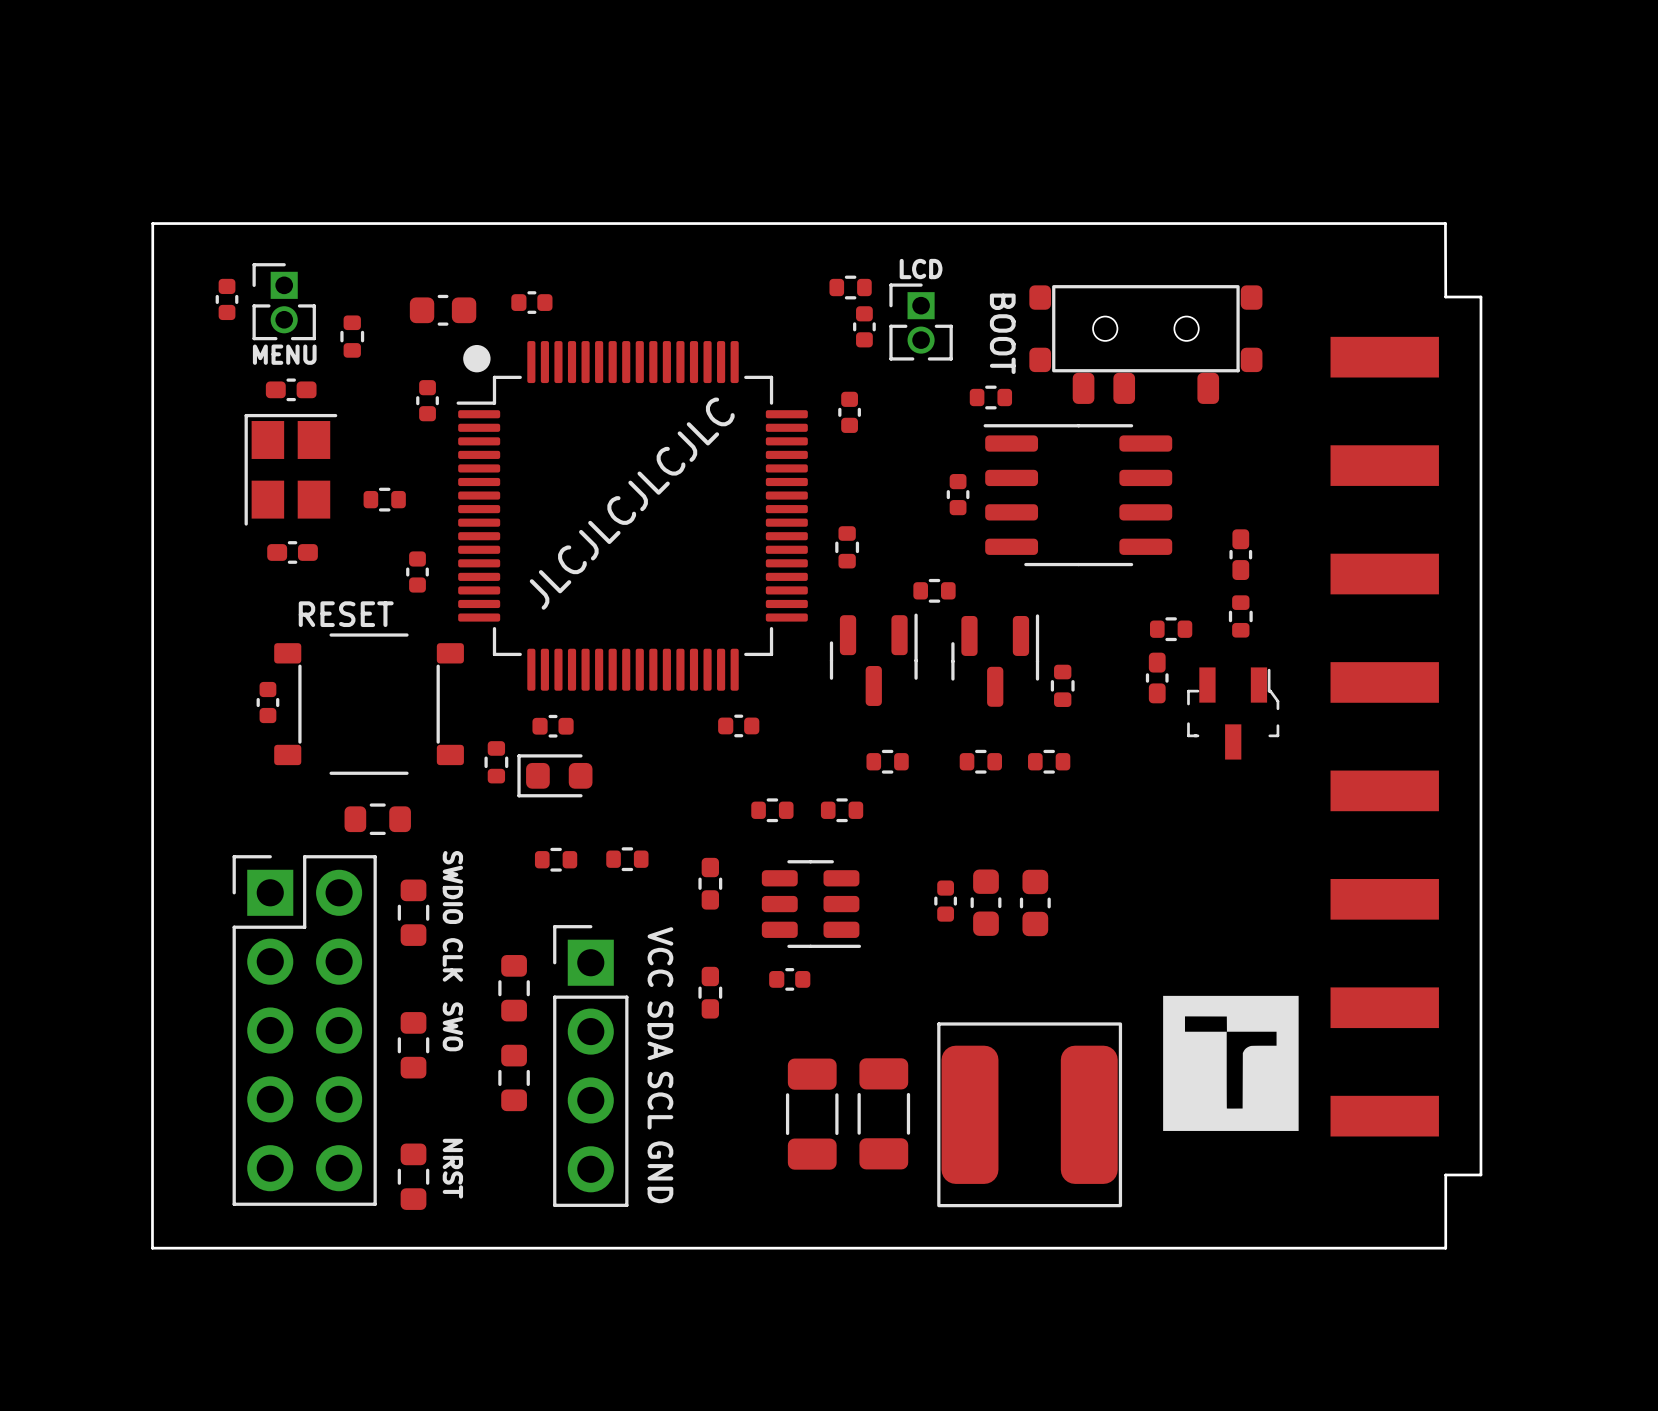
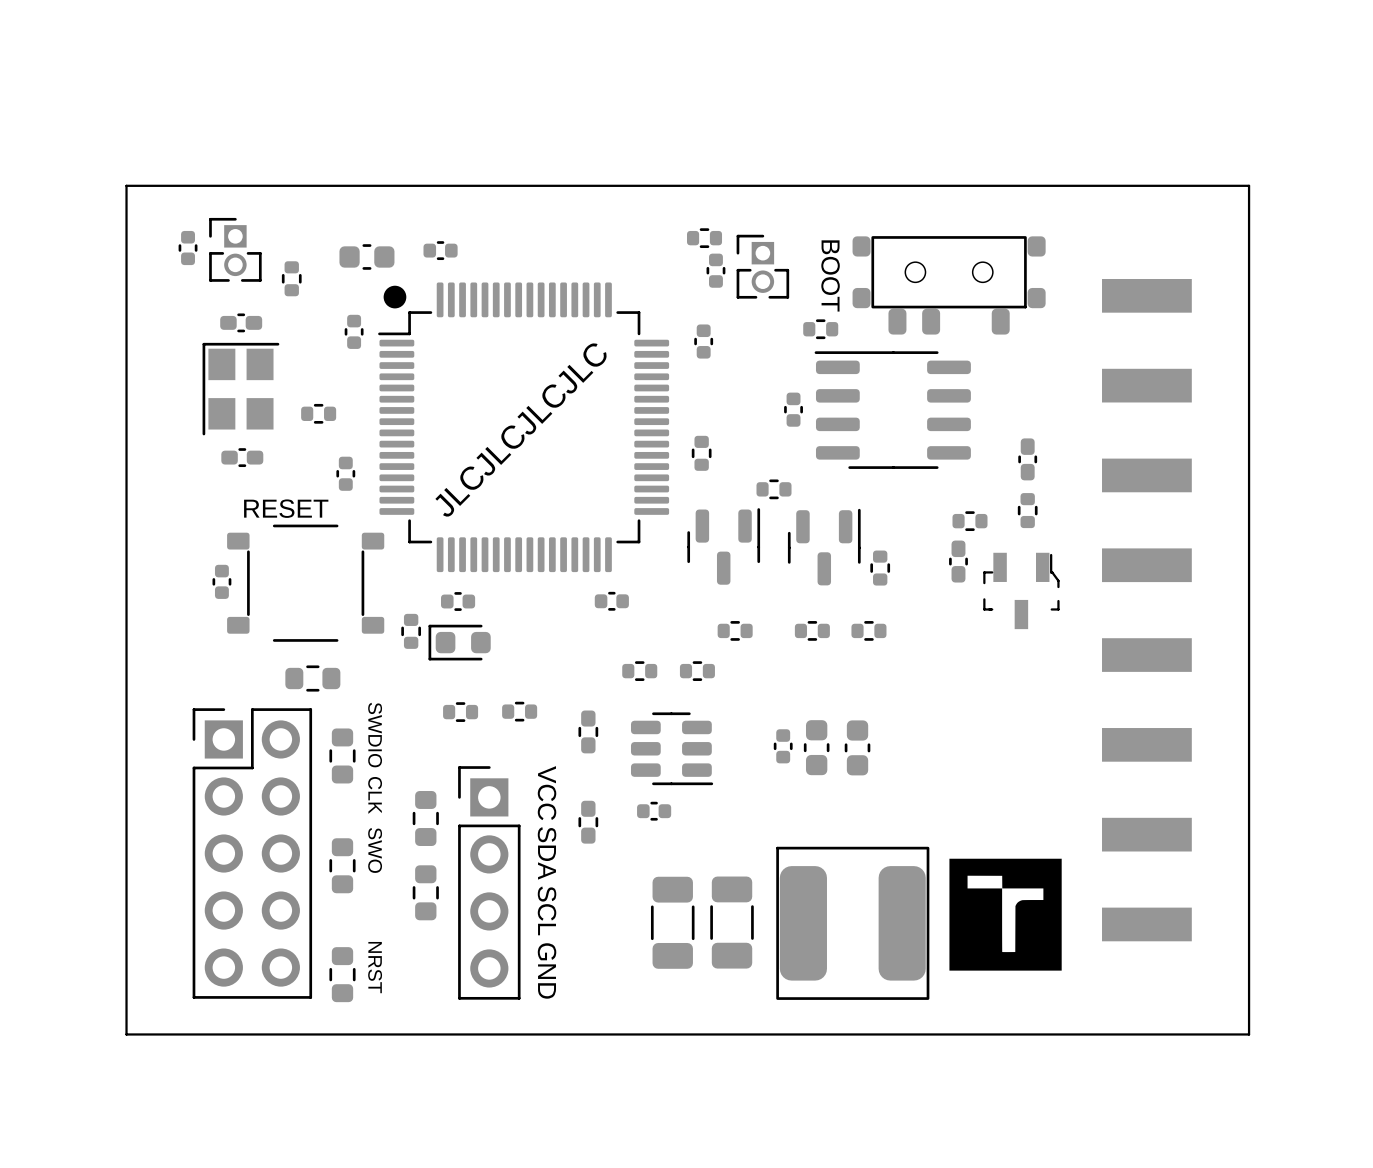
board edge: (152, 223) (1445, 223) (1445, 297) (1480, 297) (1480, 1174) (1445, 1174) (1445, 1248) (152, 1248) (152, 223) -> (126, 185) (126, 1034) (1249, 1034) (1249, 185) (126, 185)
text: LCD (921, 269) -> none
text: MENU (284, 354) -> none
text position: JLCJLCJLCJLC (632, 503) -> JLCJLCJLCJLC (521, 430)
drawing position: (1230, 1063) -> (1005, 914)

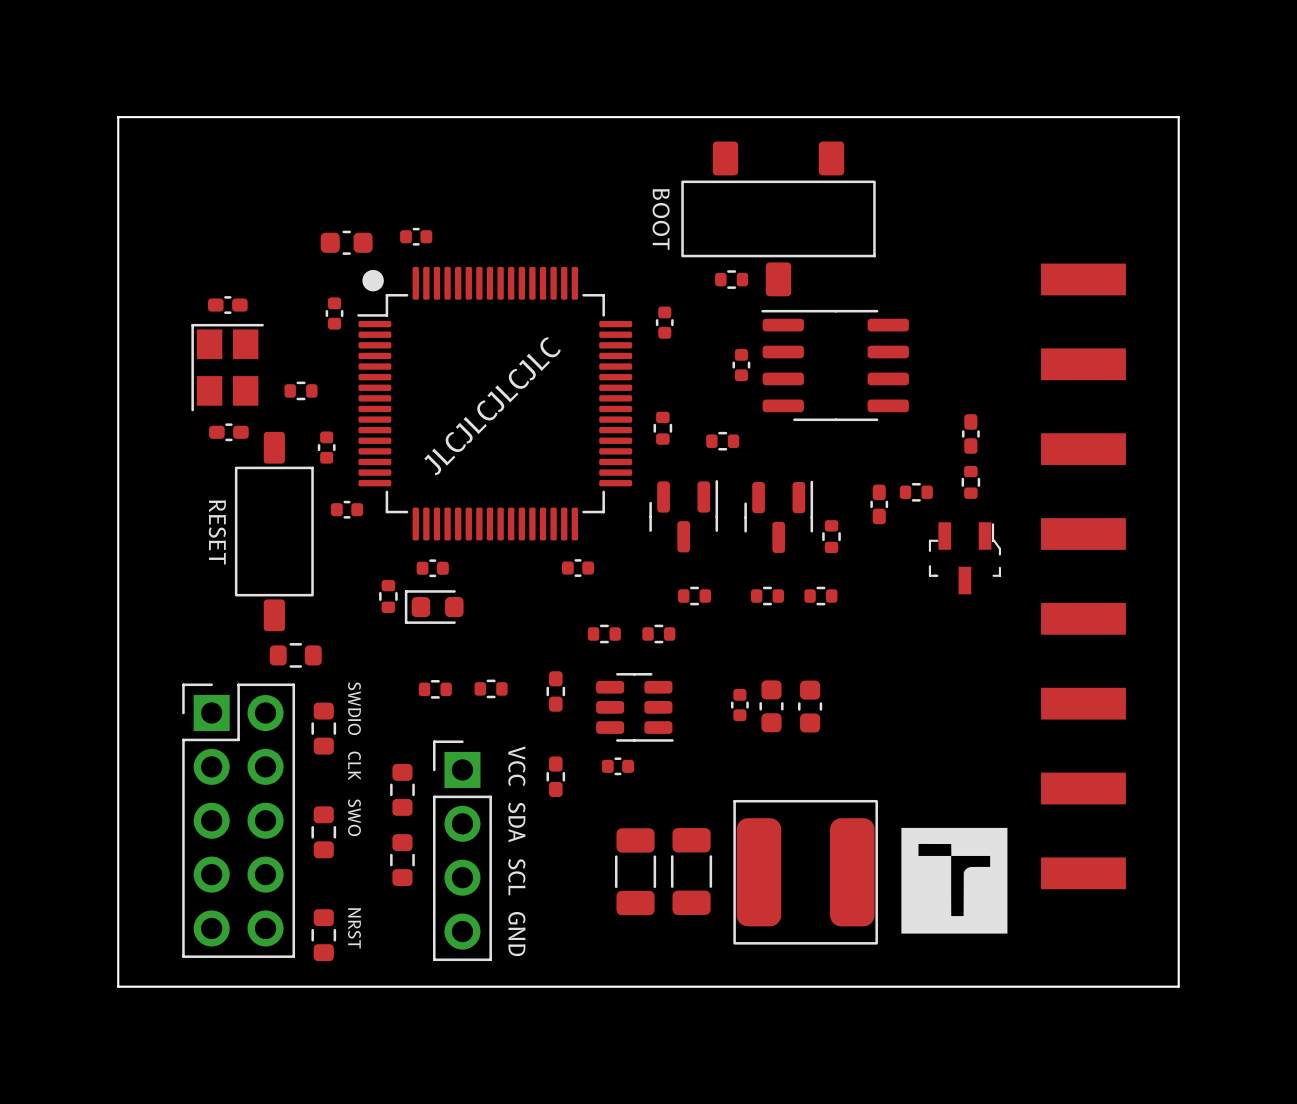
board edge: (126, 185) (1249, 185) (1249, 1034) (126, 1034) (126, 185) -> (118, 117) (118, 986) (1178, 986) (1178, 117) (118, 117)
part: none -> (778, 218)
part: (704, 238) -> none
part: (188, 248) -> none
part: (235, 249) -> none
part: (762, 266) -> none
part: (715, 270) -> none
text position: BOOT (830, 275) -> BOOT (661, 219)
part: (291, 278) -> none
part: (949, 285) -> none
part: none -> (731, 279)
part: (820, 329) -> none
part position: (793, 409) -> (741, 365)
part position: (892, 410) -> (835, 365)
part position: (774, 489) -> (722, 441)
text rotation: 0° (286, 508) -> 90° clockwise (217, 532)
part position: (958, 561) -> (879, 504)
part: none -> (274, 531)
part rotation: 0° (221, 581) -> 90° clockwise (347, 509)
part position: (221, 581) -> (347, 509)
part: (305, 583) -> none
part position: (312, 678) -> (295, 655)
part position: (519, 711) -> (491, 688)
part position: (460, 712) -> (435, 689)
text position: SWDIO (375, 735) -> SWDIO (354, 708)
part position: (342, 755) -> (323, 728)
text position: VCC (547, 793) -> VCC (516, 766)
text position: CLK (375, 795) -> CLK (354, 765)
part position: (425, 818) -> (402, 789)
text position: SWO (375, 850) -> SWO (354, 817)
part position: (252, 853) -> (238, 820)
text position: SDA (547, 853) -> SDA (516, 822)
part position: (342, 865) -> (323, 832)
part position: (489, 882) -> (462, 850)
part position: (425, 892) -> (402, 860)
text position: SCL (547, 910) -> SCL (516, 877)
drawing position: (1005, 914) -> (954, 880)
text position: NRST (375, 967) -> NRST (354, 928)
text position: GND (547, 970) -> GND (516, 934)
part position: (342, 974) -> (323, 935)

